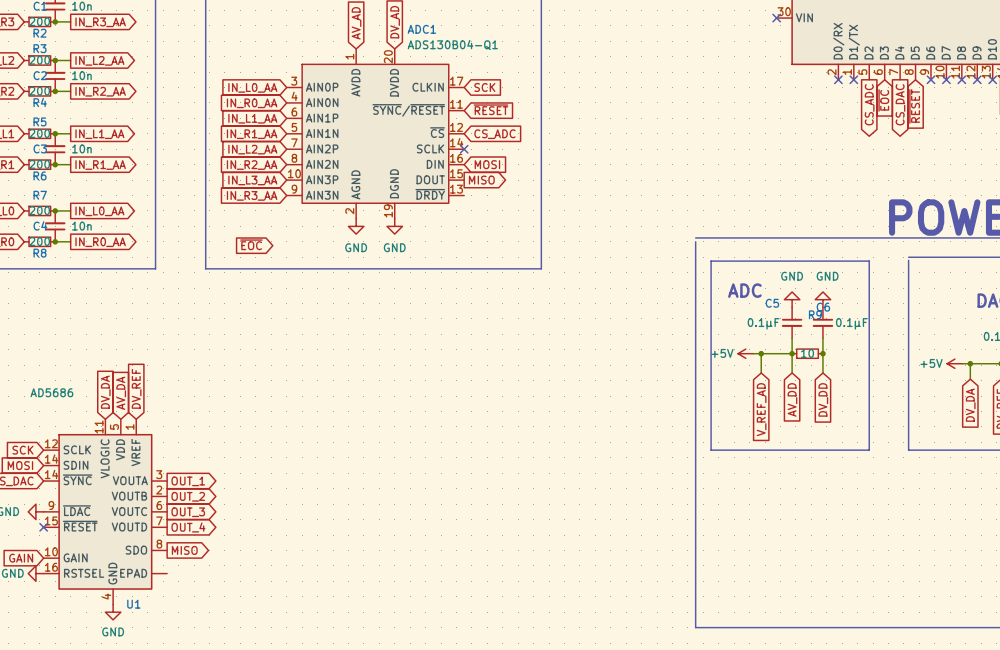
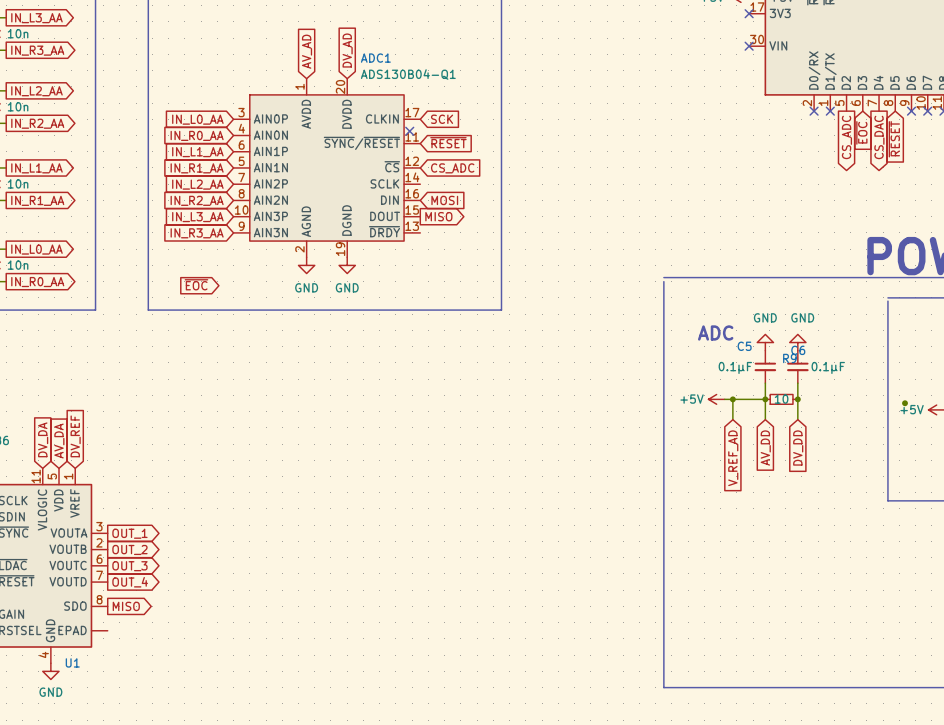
no-connect mark: none -> (409, 131)
no-connect mark: (464, 149) -> none
line: (711, 261) (869, 261) (869, 450) (711, 450) (711, 261) -> none
junction: none -> (905, 403)

